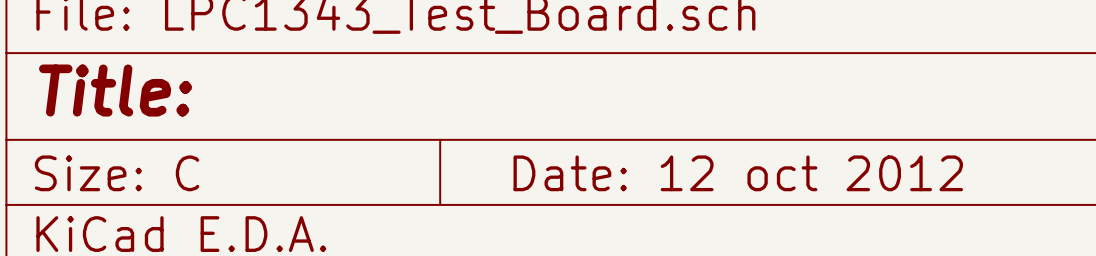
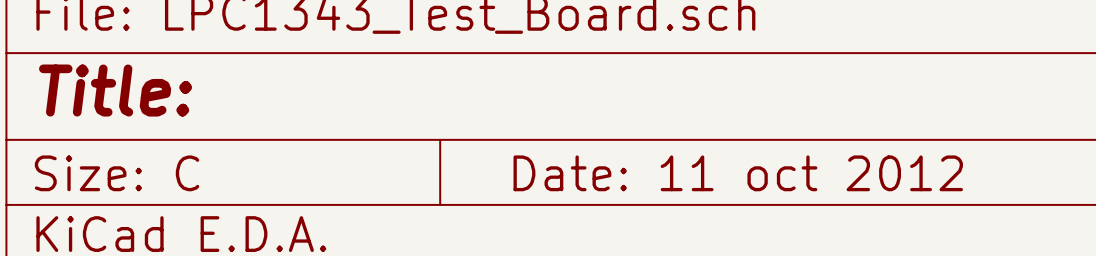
title block: Date: 12 oct 2012 (738, 173) -> Date: 11 oct 2012 (738, 173)

